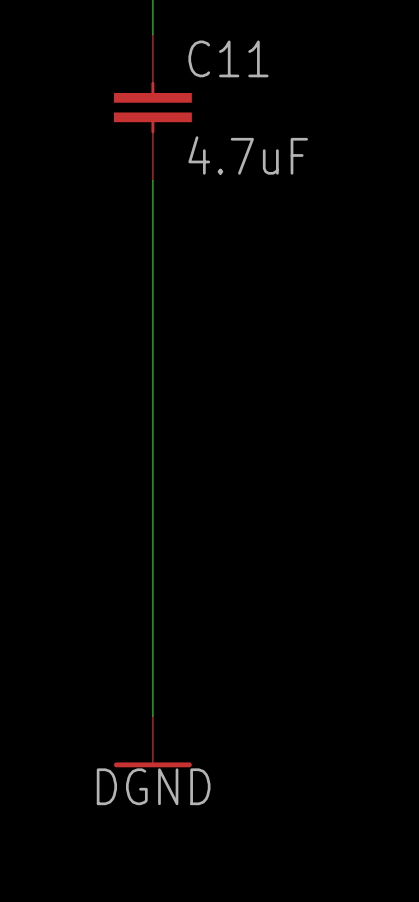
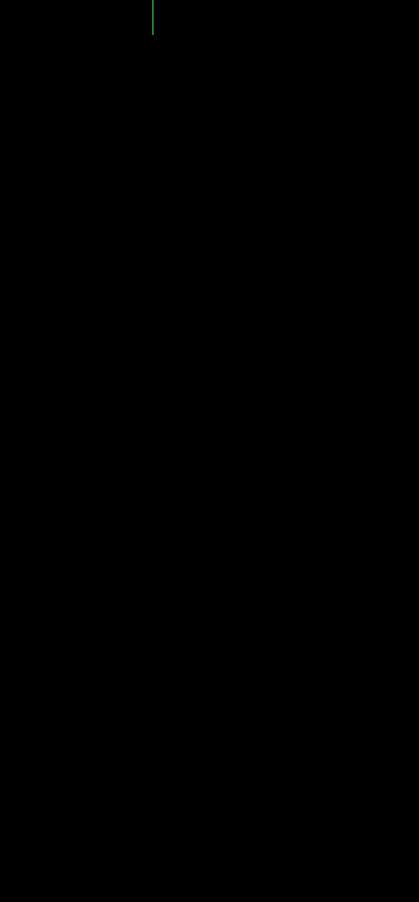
C11: 4.7uF (152, 107) -> none
wire: (152, 180) (152, 716) -> none
power symbol: DGND (152, 741) -> none

